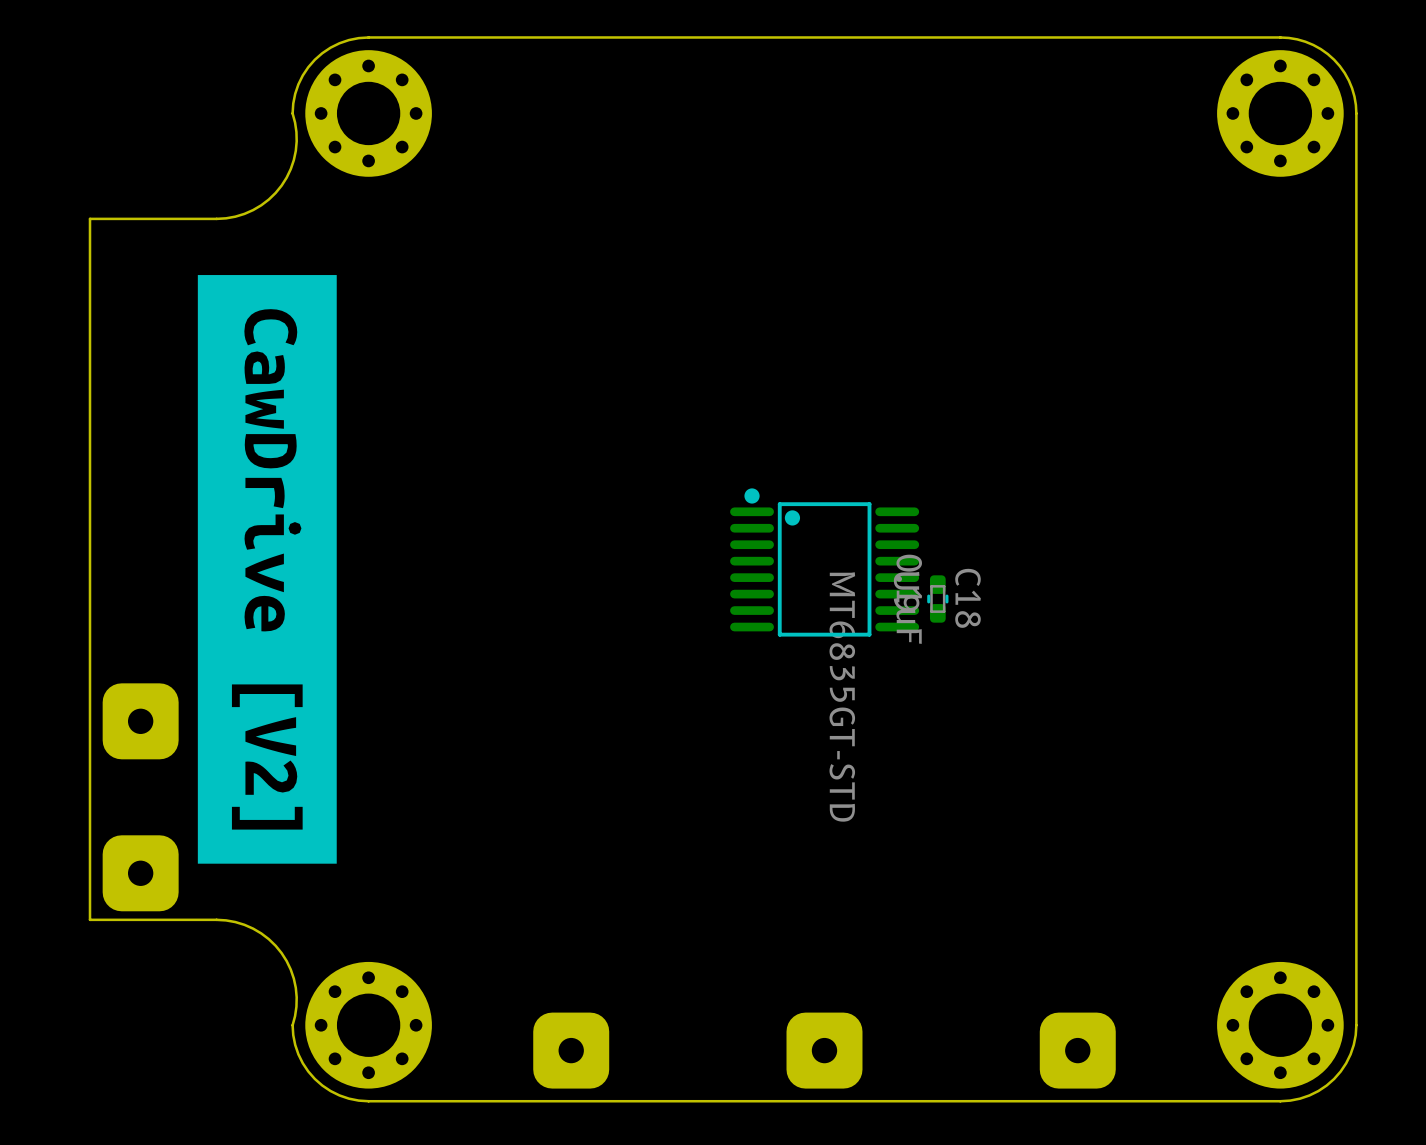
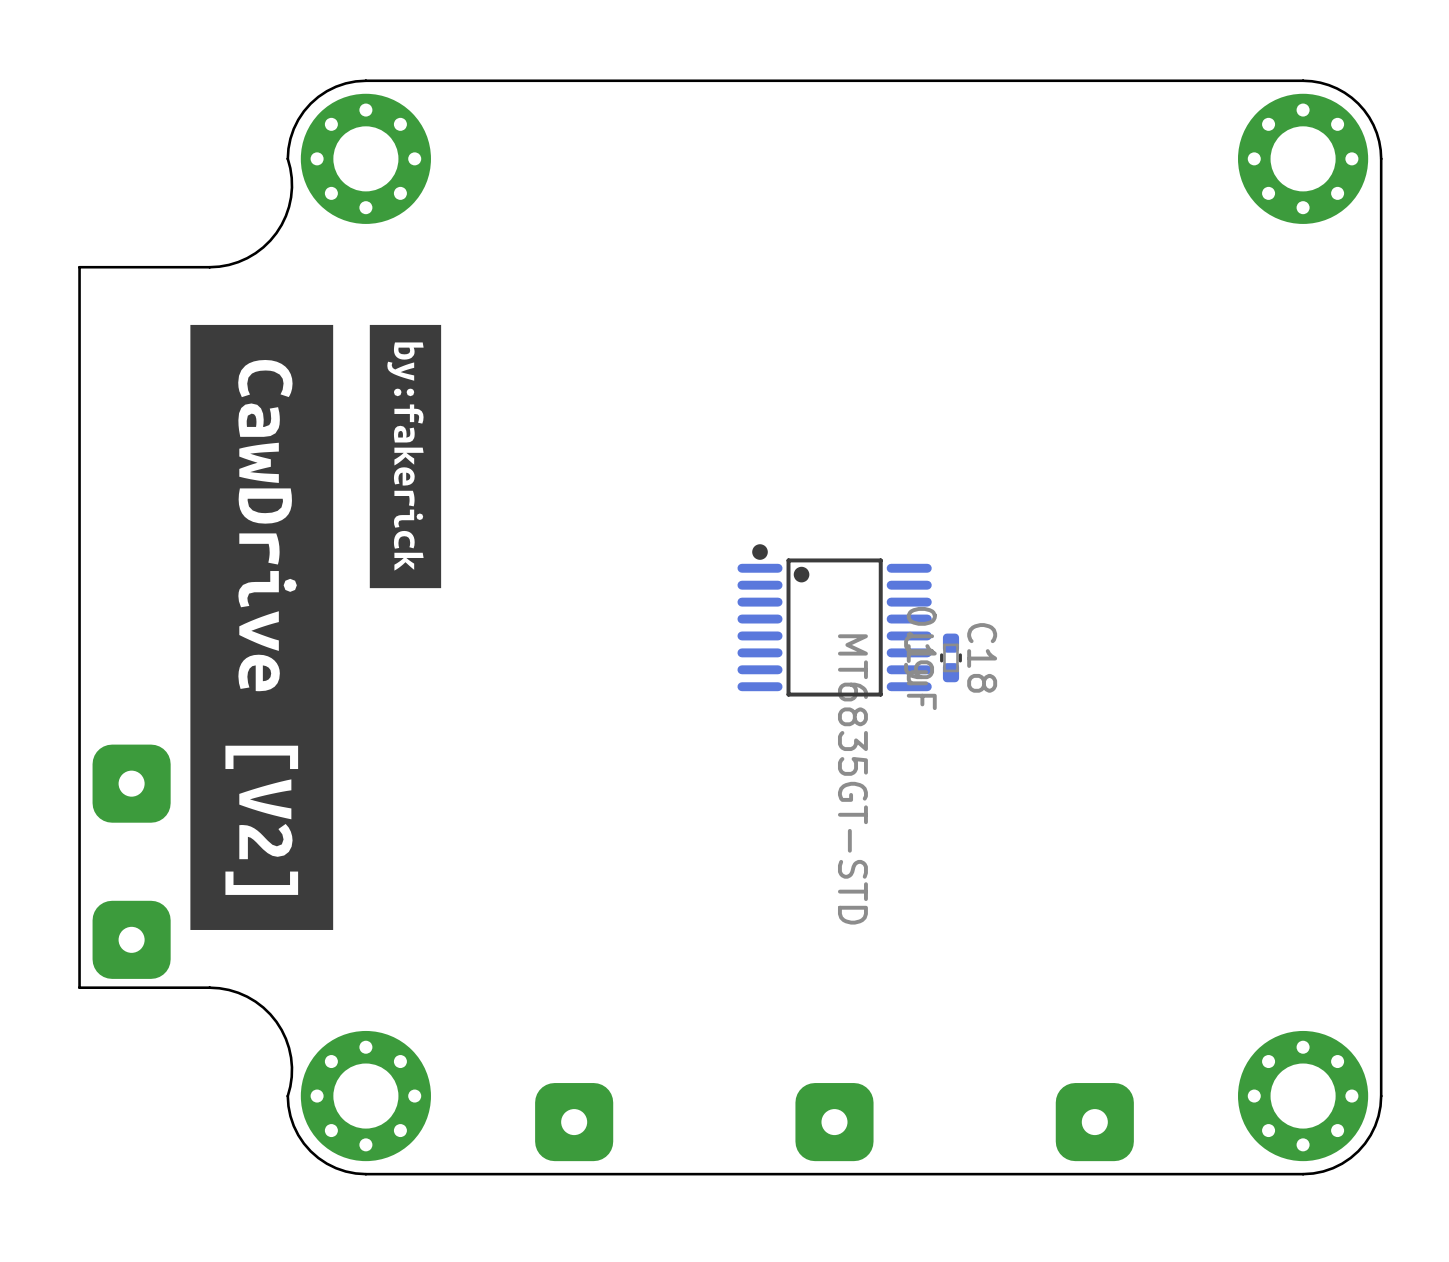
drawing: none -> [369, 324, 442, 589]

